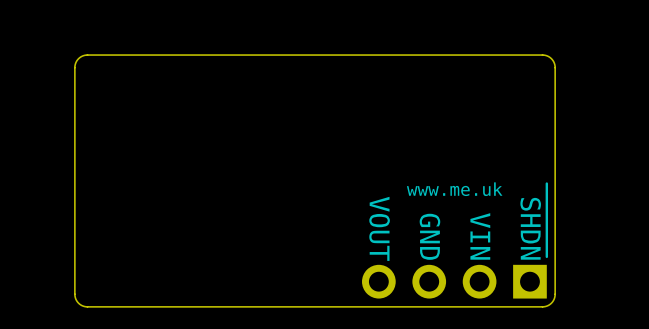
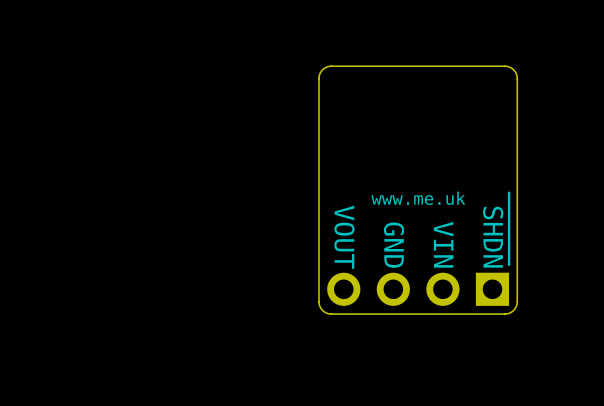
board edge: (366, 55) (87, 55) (78, 58) (74, 67) (74, 294) (79, 304) (87, 306) (366, 306) -> (331, 66) (322, 69) (318, 78) (318, 301) (322, 310) (331, 314)

